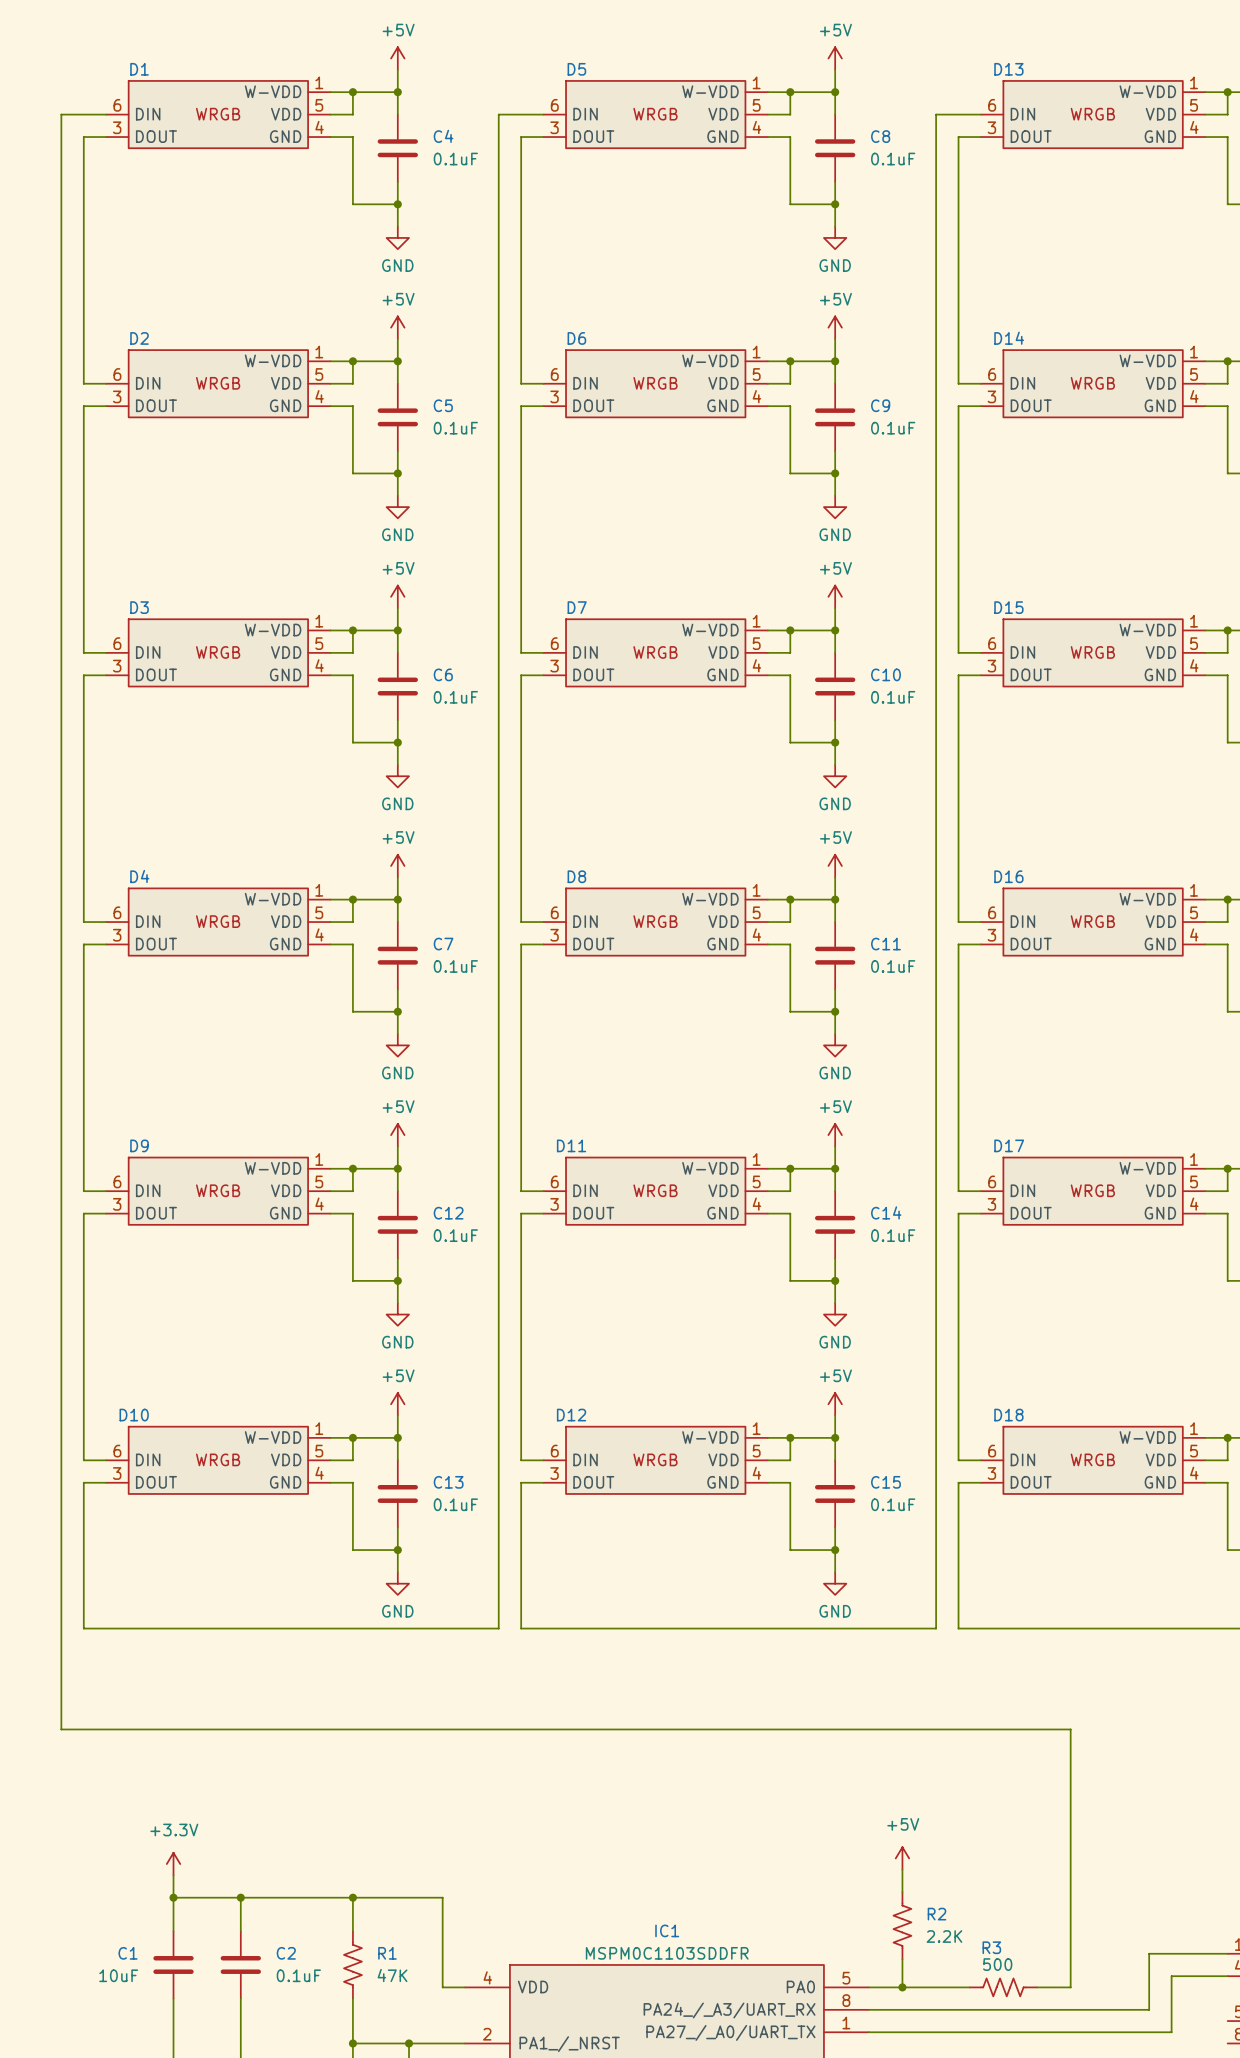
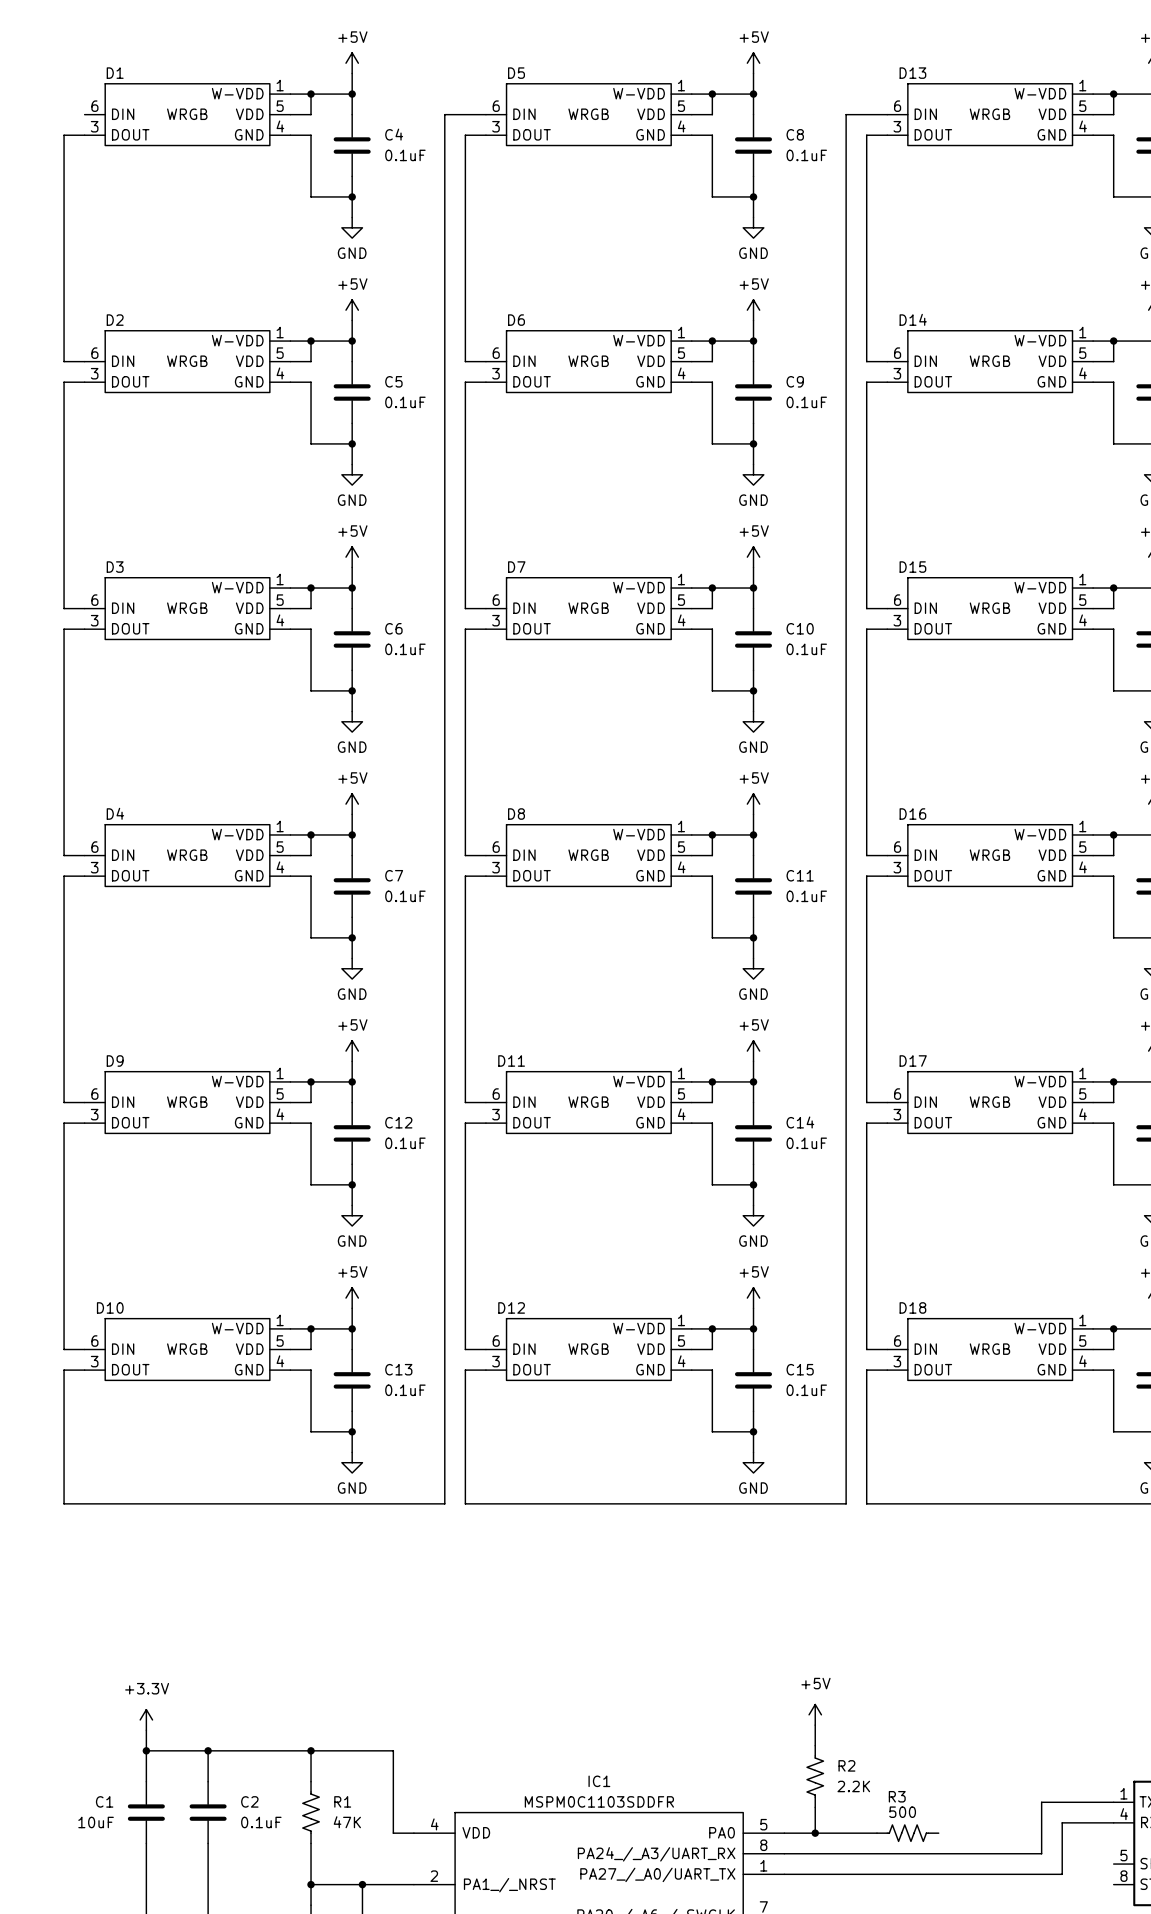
wire: (106, 114) (61, 114) (61, 1729) (1070, 1729) (1070, 1987) (1037, 1987) -> none

